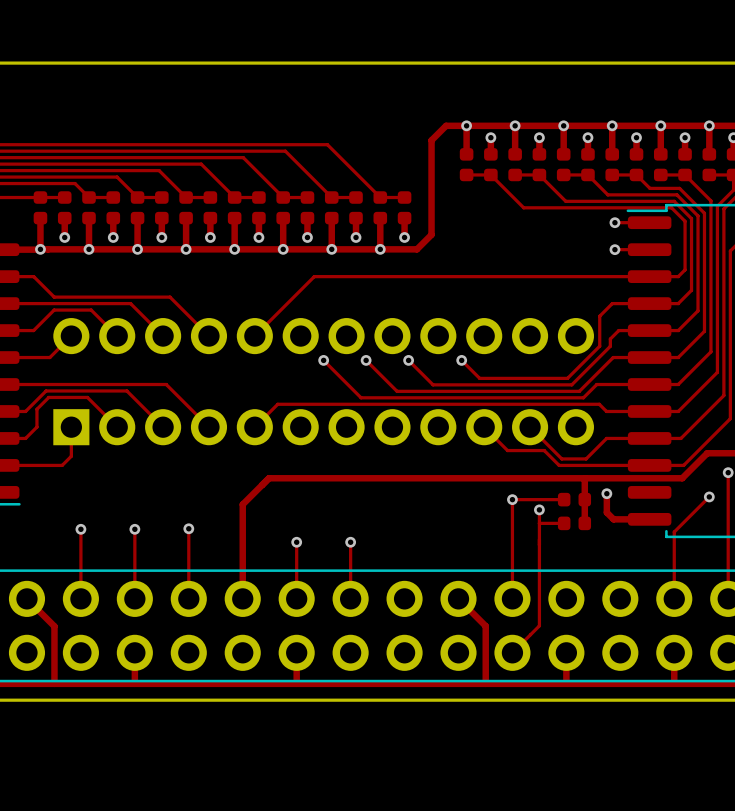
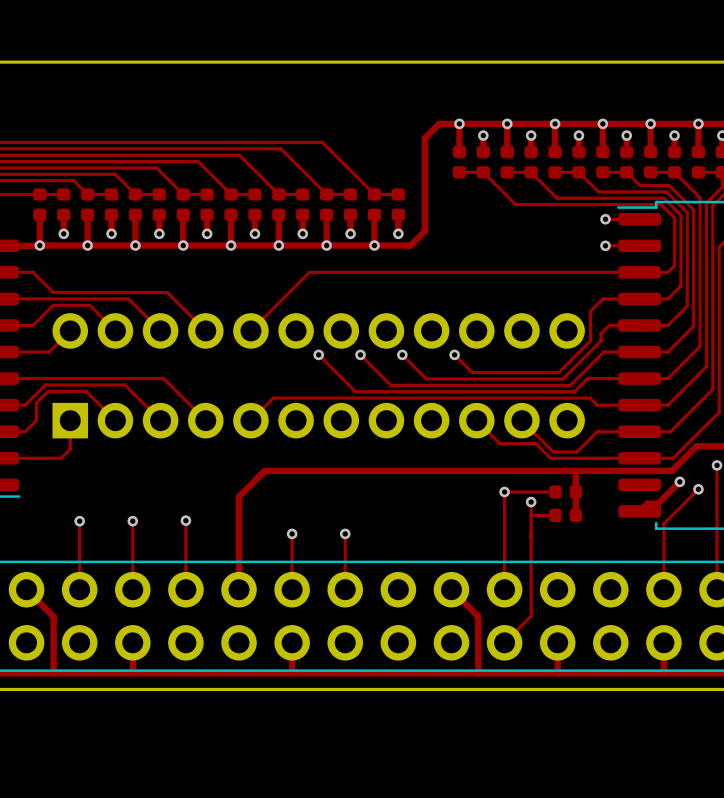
track: (606, 493) (606, 512) (613, 519) (649, 519) -> (679, 481) (658, 503) (647, 503) (639, 511)
via position: (606, 493) -> (679, 481)

